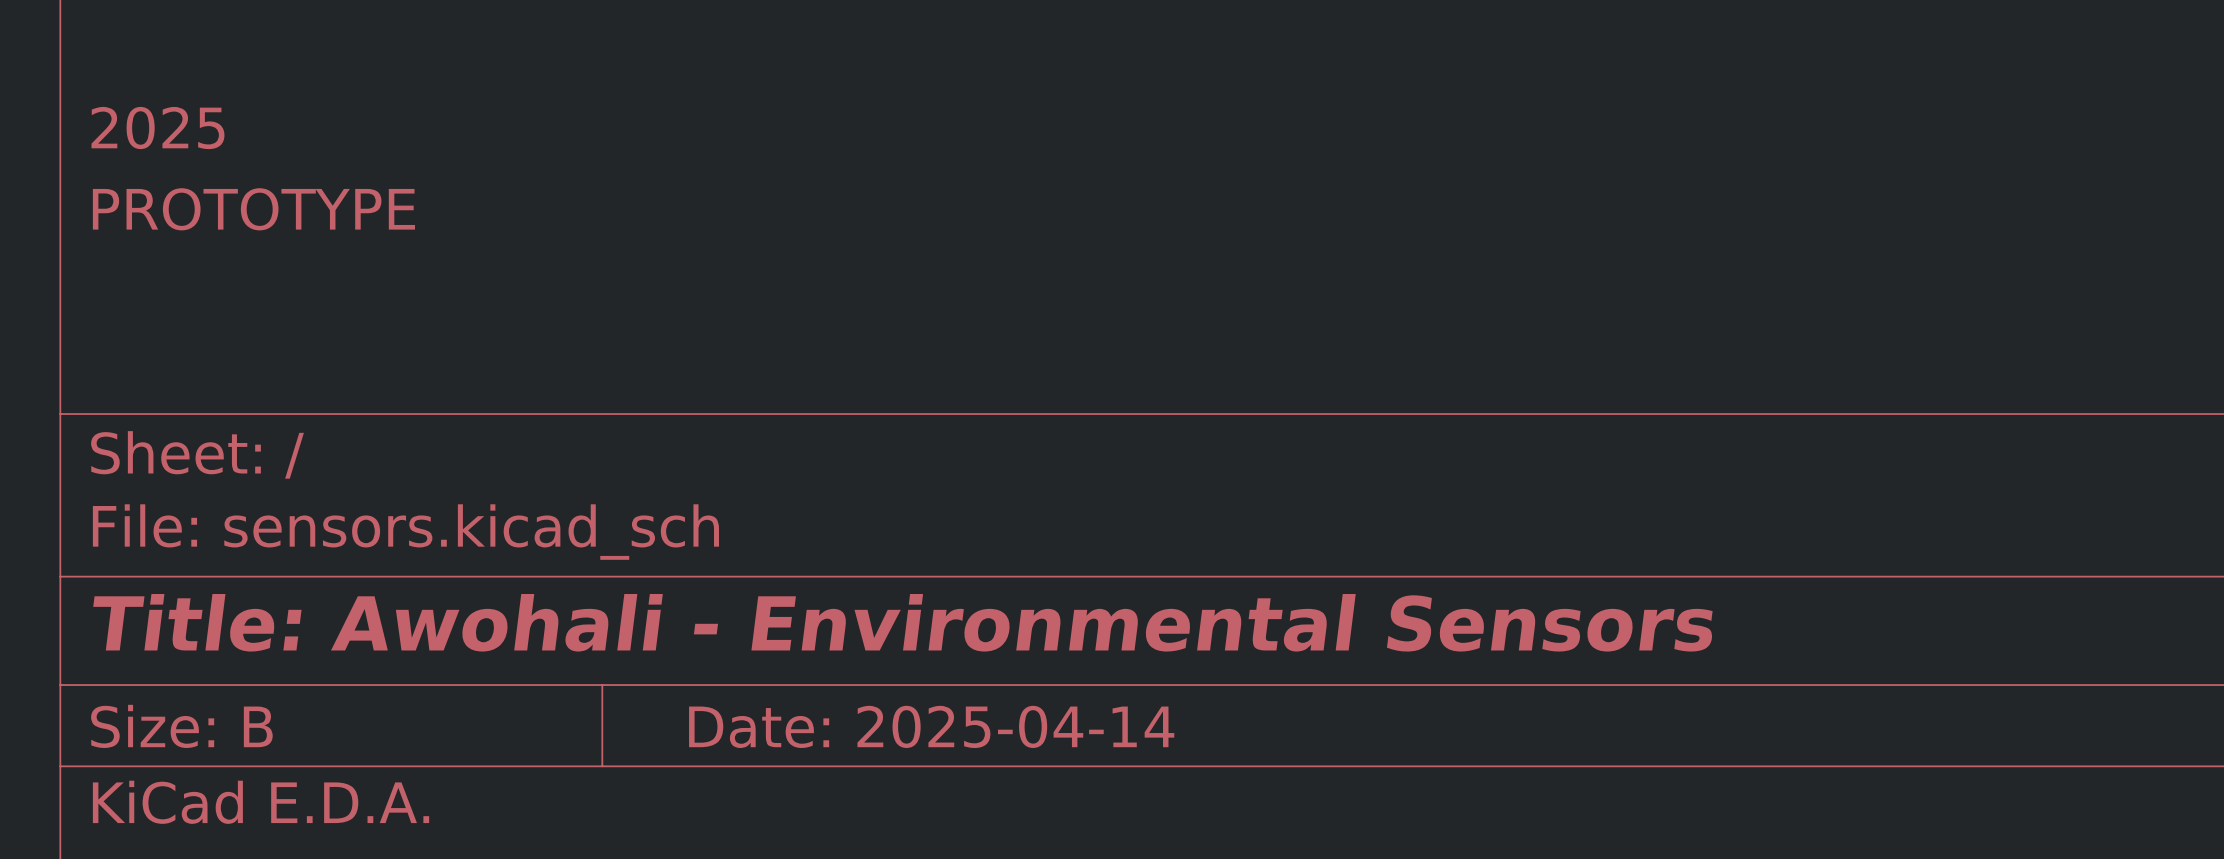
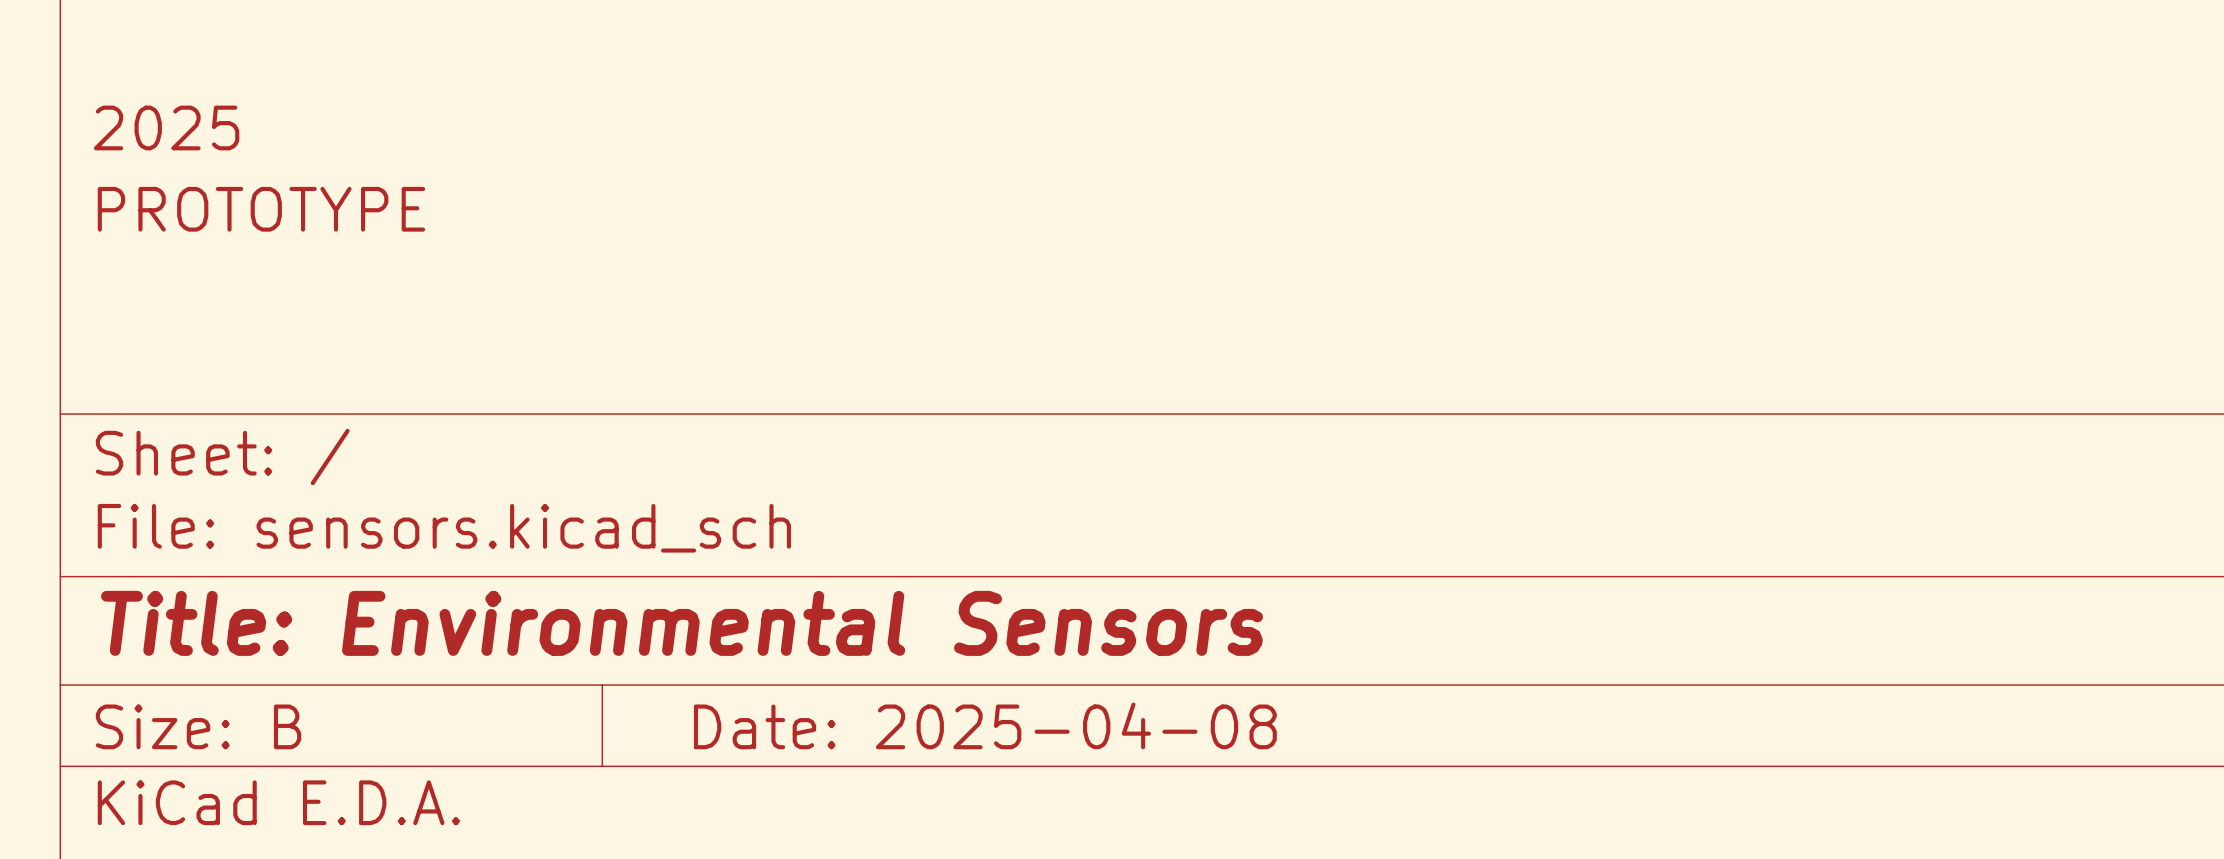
title block: Title: Awohali - Environmental Sensors (902, 622) -> Title: Environmental Sensors (682, 623)
title block: Date: 2025-04-14 (931, 726) -> Date: 2025-04-08 (985, 725)

